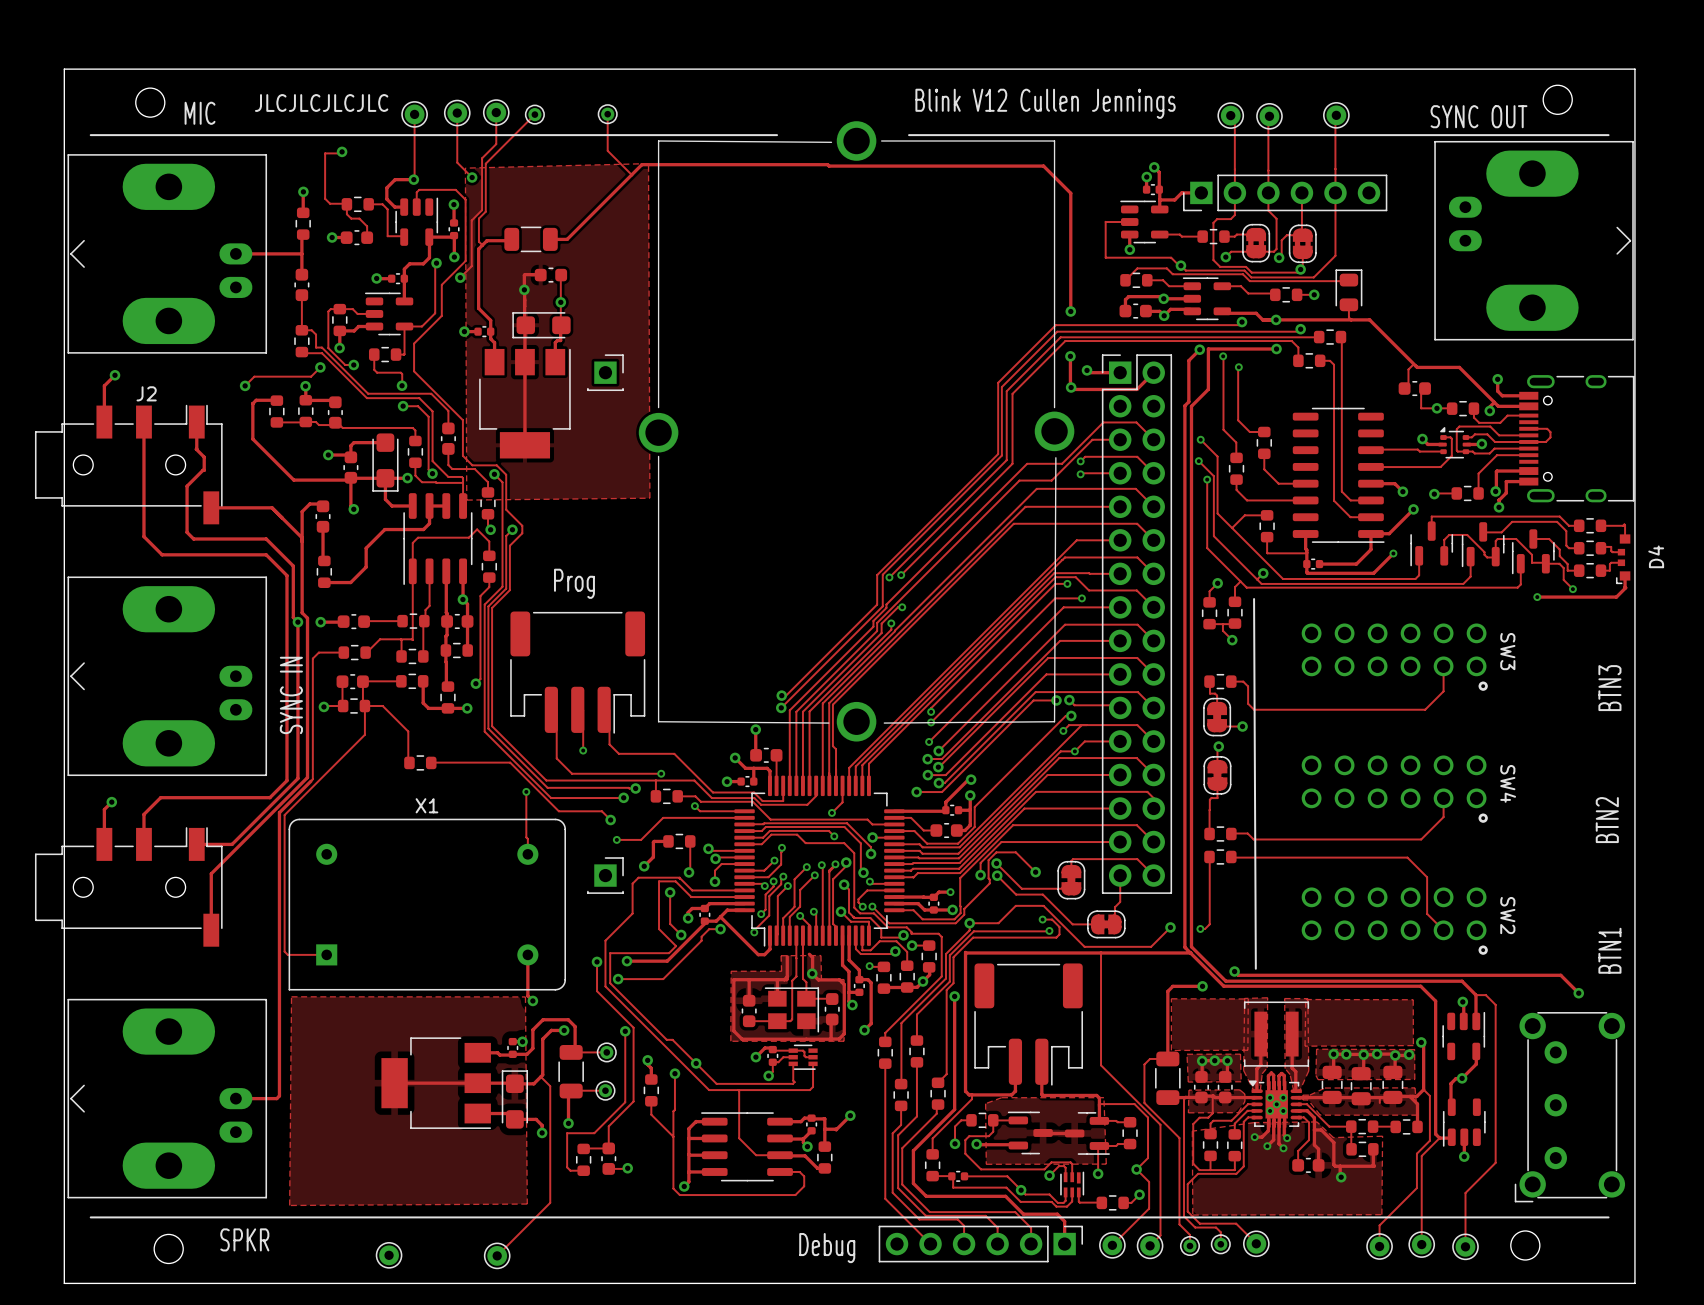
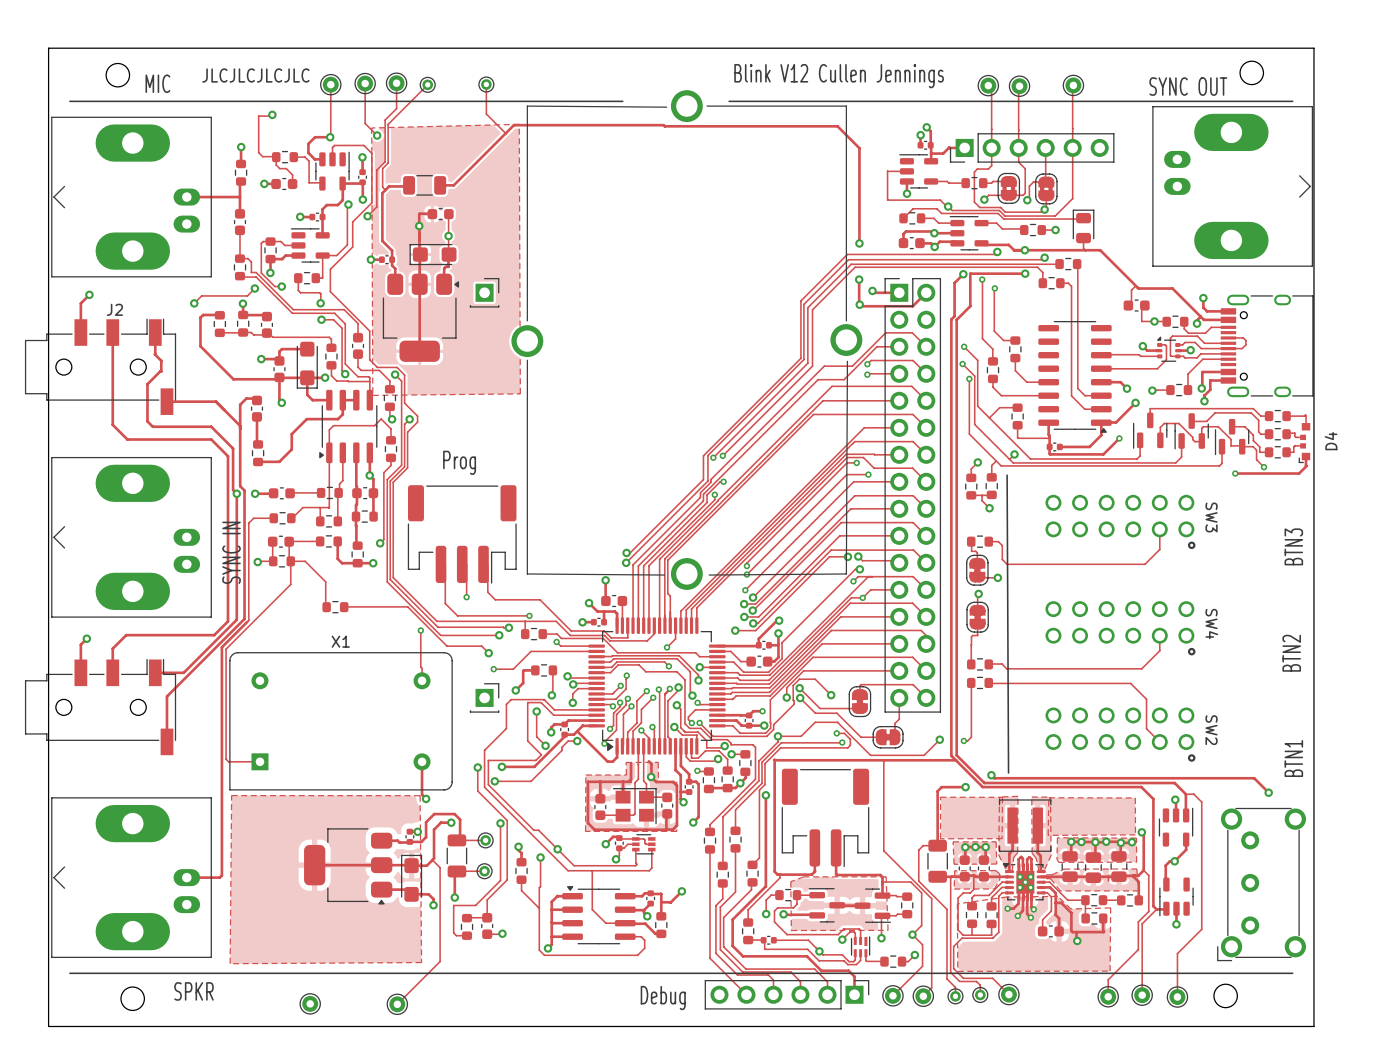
part footprint: [479, 348, 571, 459] -> [382, 273, 460, 362]
part footprint: [1292, 407, 1385, 543] -> [1038, 321, 1112, 433]
part footprint: [403, 493, 473, 585] -> [319, 389, 378, 464]
part footprint: [734, 775, 905, 947] -> [588, 617, 726, 755]
part footprint: [381, 1037, 492, 1129] -> [304, 828, 393, 905]
part footprint: [701, 1112, 793, 1182] -> [562, 886, 636, 945]

